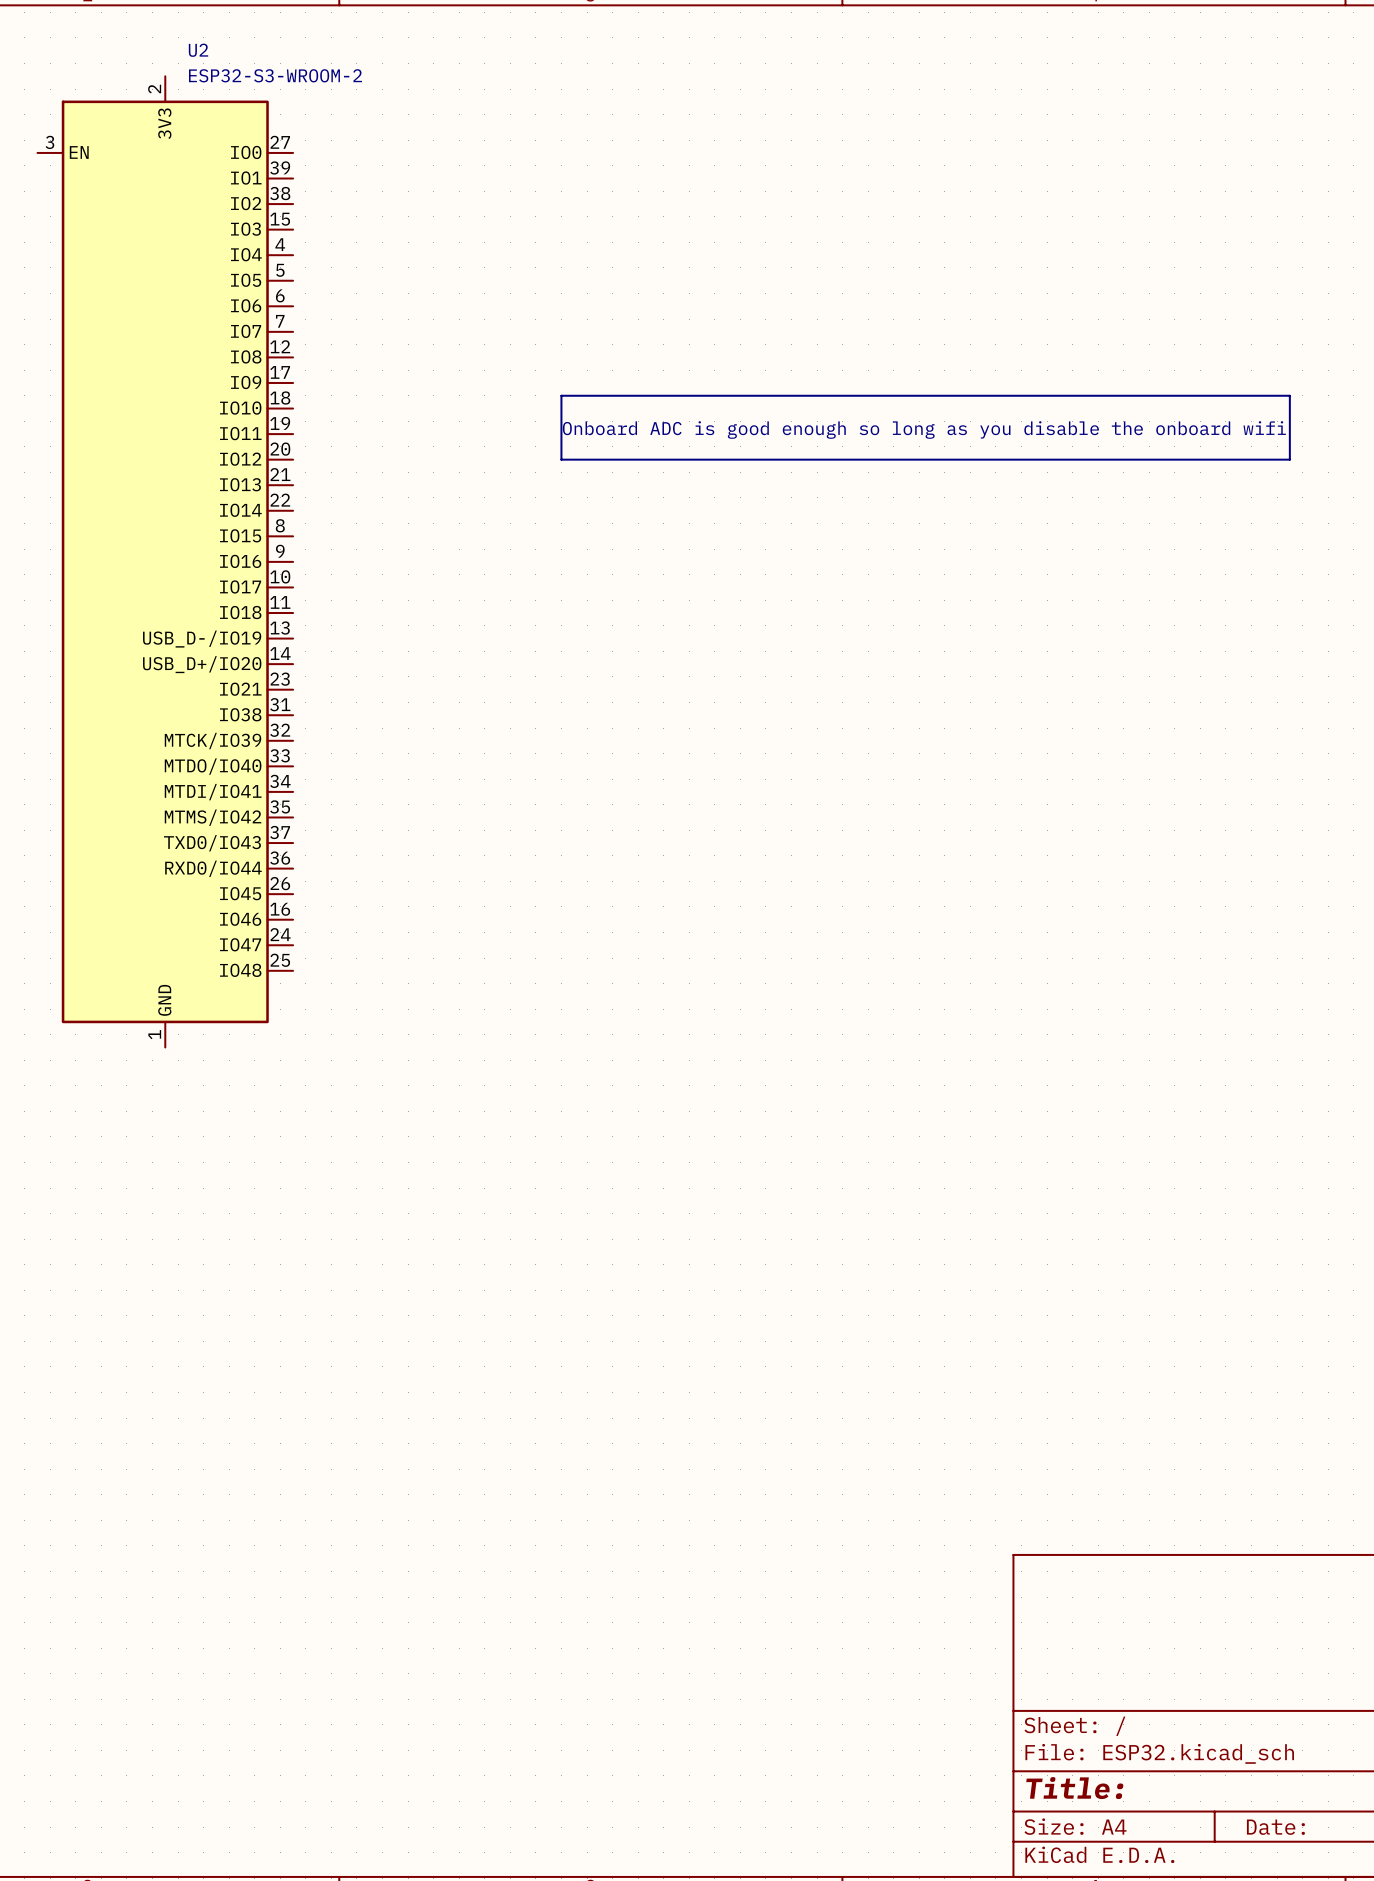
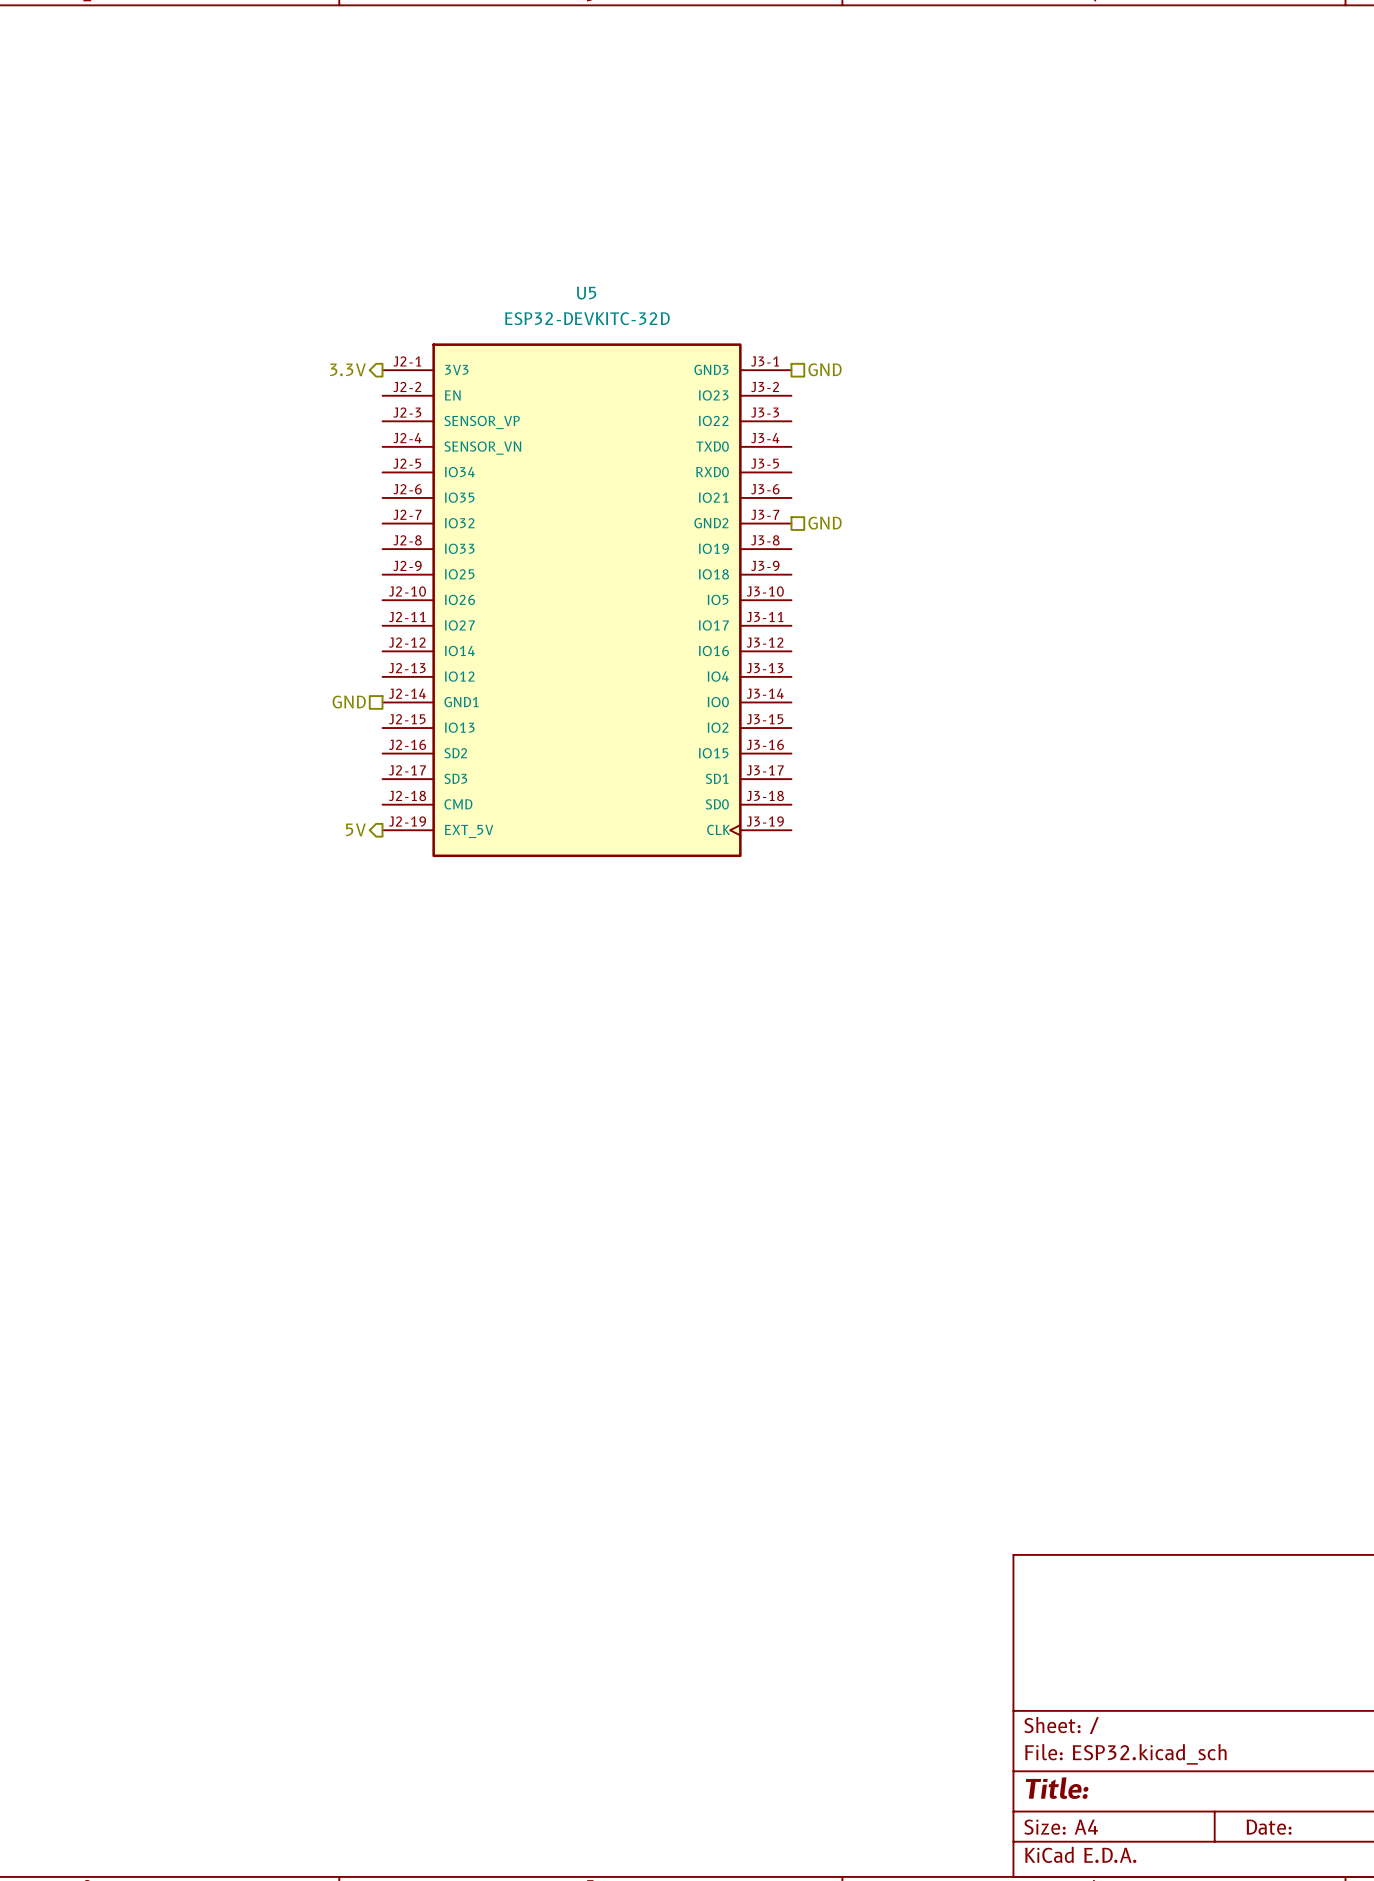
hierarchical label: none -> 3.3V (347, 369)
hierarchical label: none -> GND (825, 369)
line: (561, 395) (1289, 395) (1289, 459) (561, 459) (561, 395) -> none
text: Onboard ADC is good enough so long as you disable the onboard wifi (924, 430) -> none
hierarchical label: none -> GND (825, 523)
U2: ESP32-S3-WROOM-2 (165, 561) -> none
U5: none -> ESP32-DEVKITC-32D (587, 600)
hierarchical label: none -> GND (349, 702)
hierarchical label: none -> 5V (355, 829)

